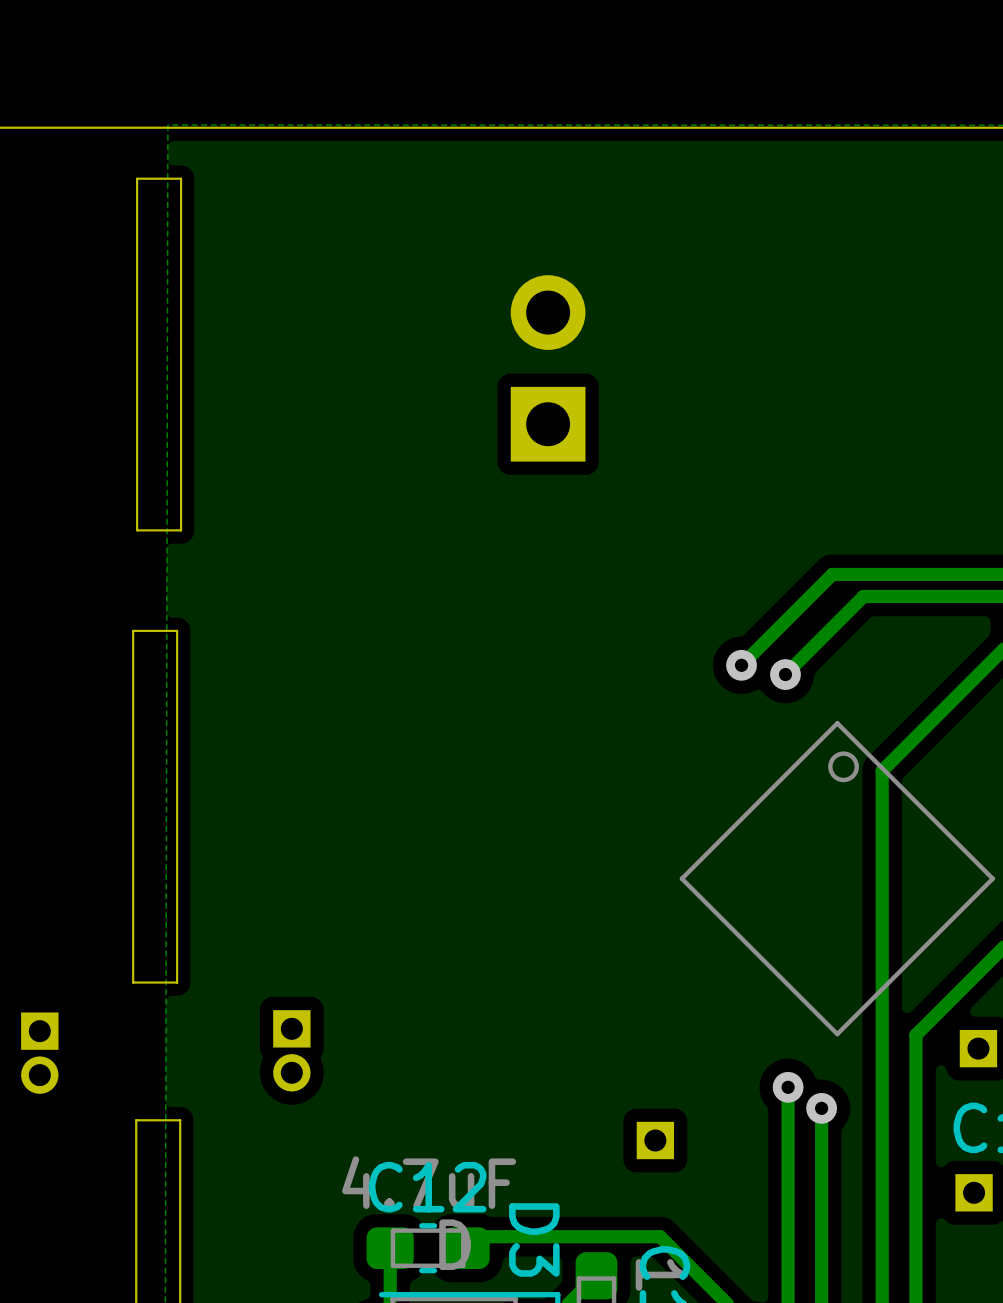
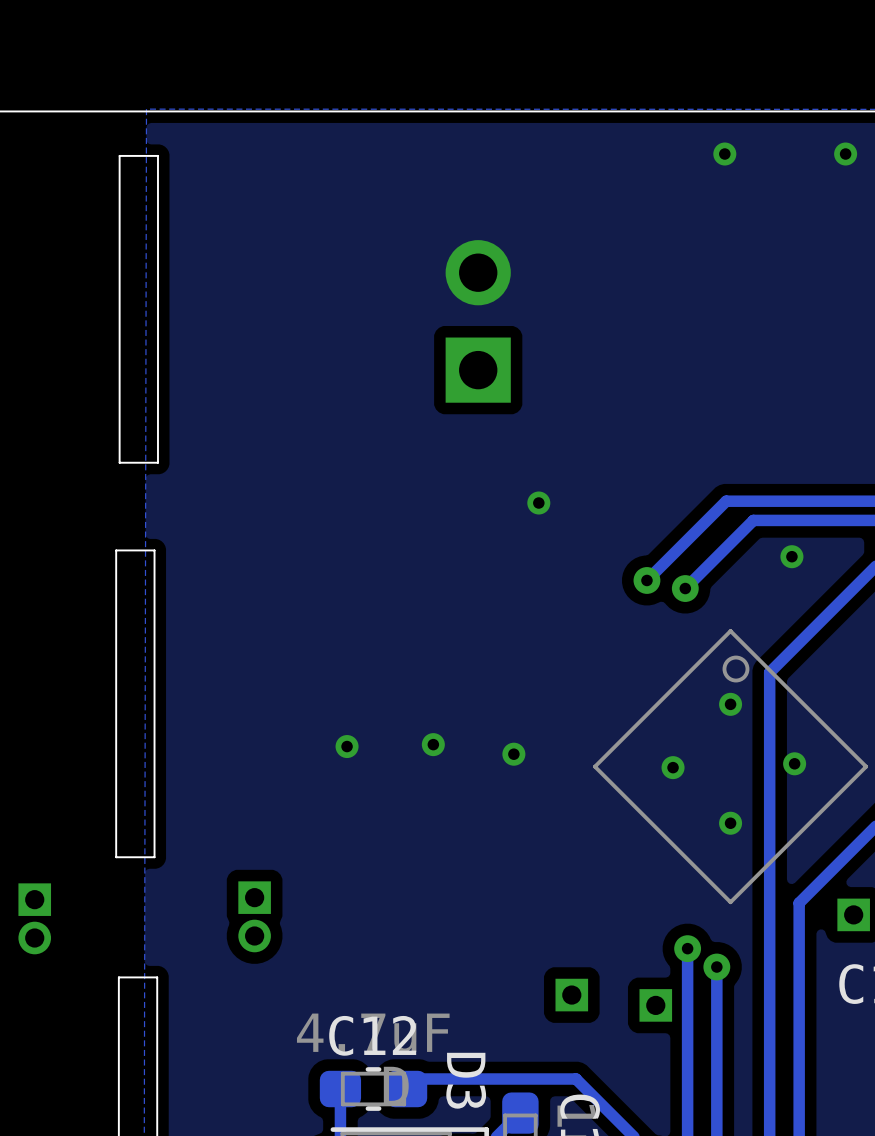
via: none -> (724, 154)
via: none -> (845, 154)
via: none -> (538, 503)
via: none -> (791, 556)
via: none -> (730, 704)
via: none -> (433, 744)
via: none -> (347, 746)
via: none -> (513, 754)
via: none -> (794, 763)
via: none -> (673, 767)
via: none -> (730, 823)
part position: (974, 1192) -> (655, 1005)

